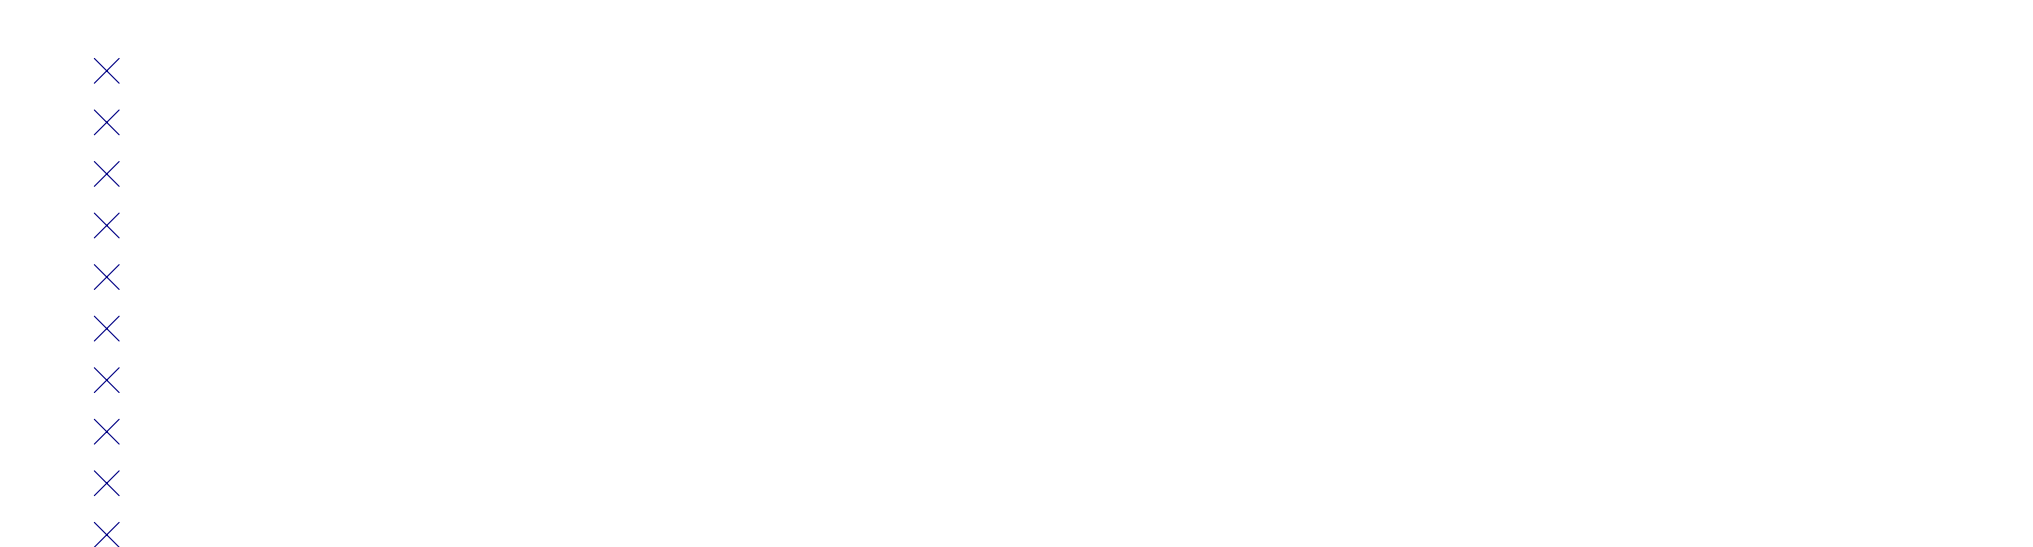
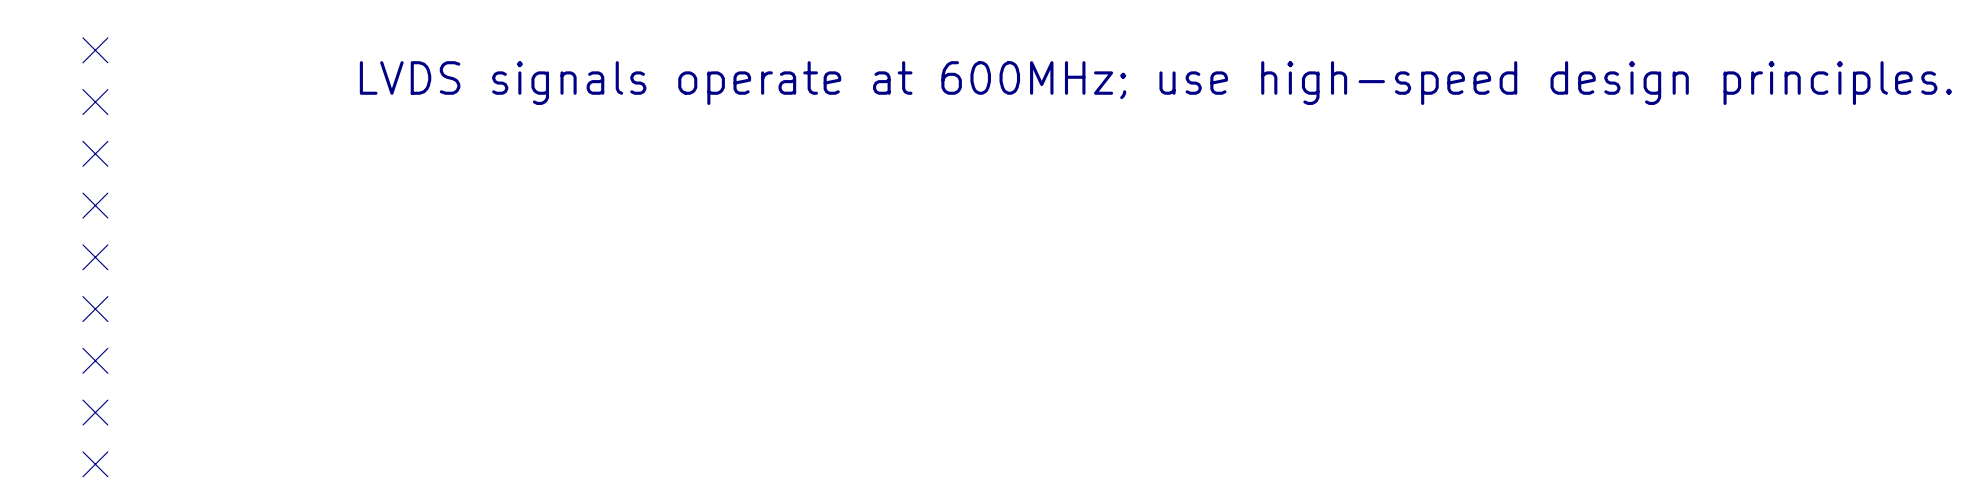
text: none -> LVDS signals operate at 600MHz; use high-speed design principles. (1155, 83)

